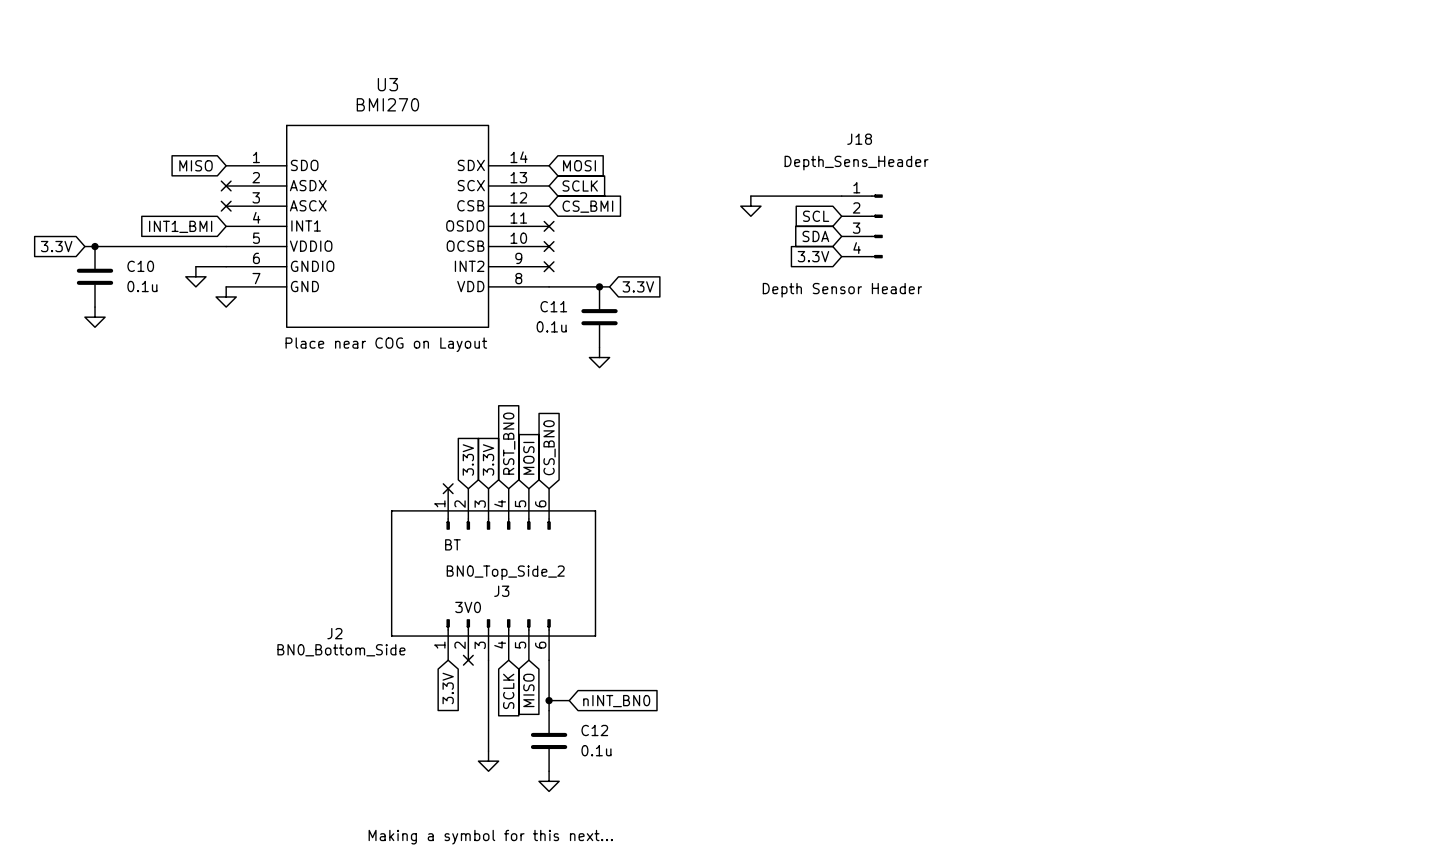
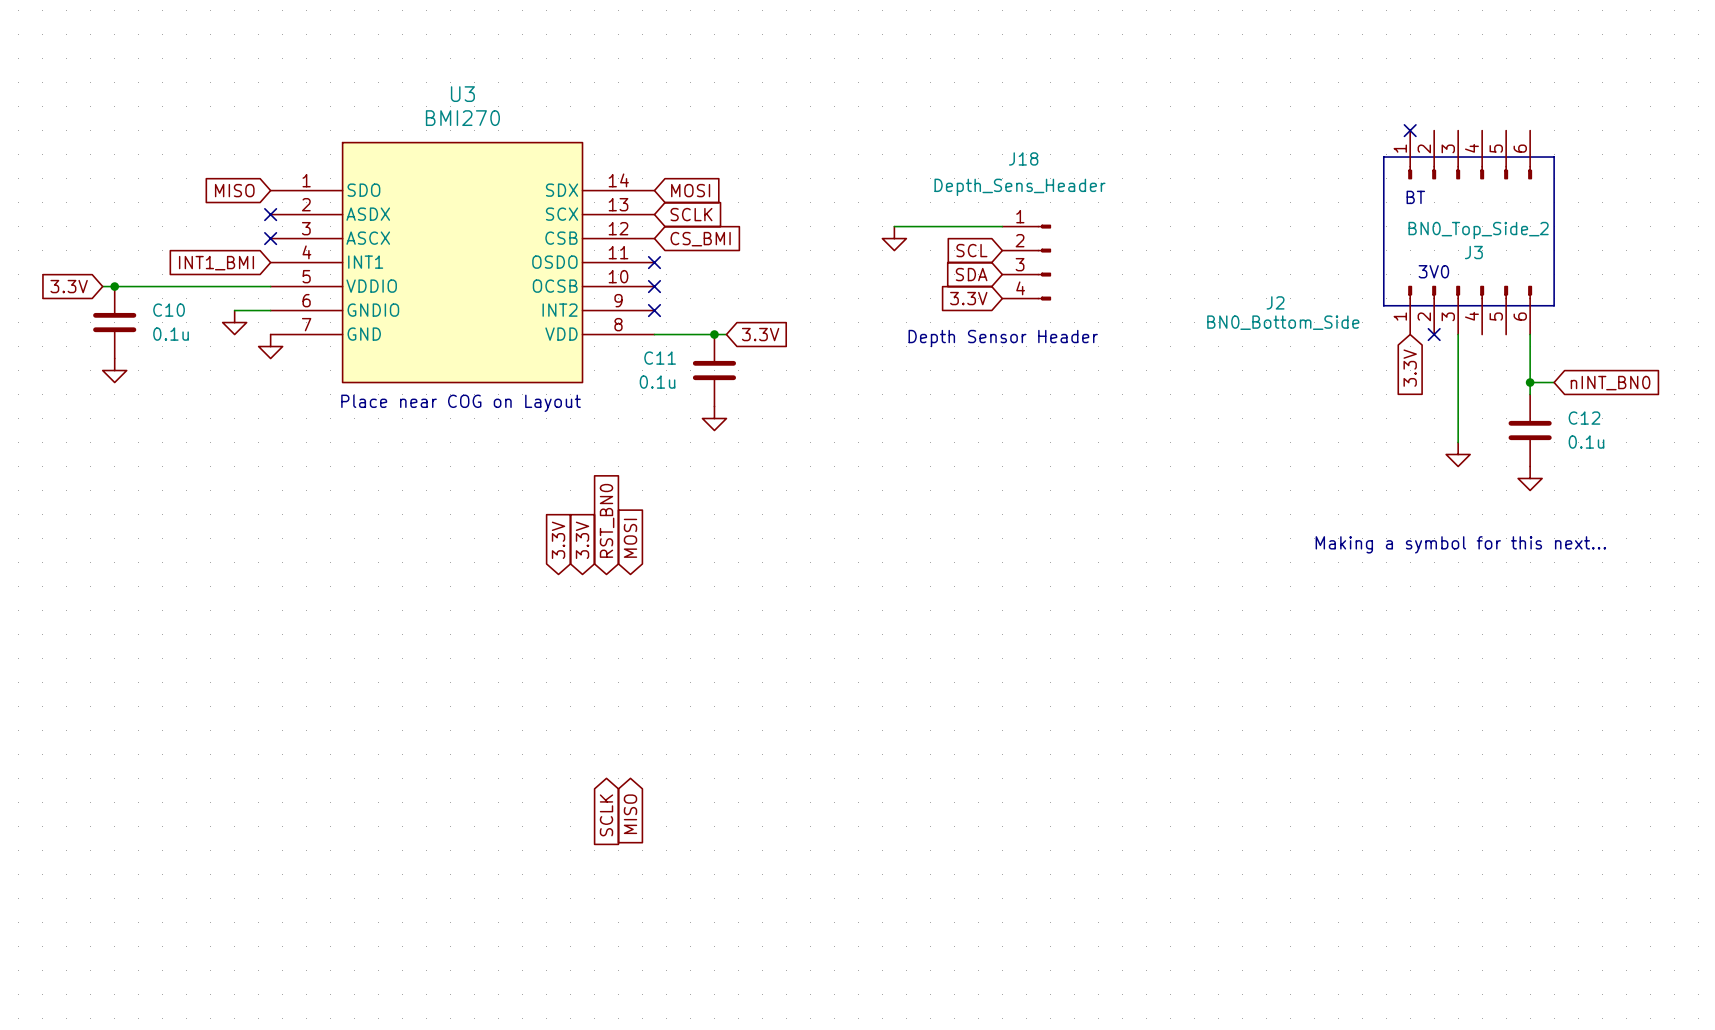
no-connect mark: none -> (1410, 130)
line: none -> (1383, 157) (1554, 157) (1554, 305) (1383, 305) (1383, 157)
text: none -> BT (1415, 197)
text: none -> 3V0 (1433, 271)
no-connect mark: none -> (1434, 334)
wire: none -> (1458, 334) (1458, 442)
wire: none -> (1530, 334) (1530, 394)
global label: none -> 3.3V (1410, 368)
wire: none -> (1530, 382) (1554, 382)
junction: none -> (1530, 382)
global label: none -> nINT_BN0 (1610, 383)
power symbol: none -> (1458, 454)
power symbol: none -> (1530, 478)
global label: CS_BN0 (549, 447) -> none
text: none -> Making a symbol for this next... (1460, 544)
no-connect mark: (448, 488) -> none
J3 position: (498, 509) -> (1470, 154)
line: (391, 510) (595, 510) (595, 636) (391, 636) (391, 510) -> none
text: BT (452, 544) -> none
text: 3V0 (468, 607) -> none
J2 position: (498, 639) -> (1470, 310)
no-connect mark: (468, 660) -> none
wire: (488, 660) (488, 751) -> none
wire: (549, 660) (549, 710) -> none
global label: 3.3V (448, 688) -> none
wire: (549, 700) (569, 700) -> none
junction: (549, 700) -> none
global label: nINT_BN0 (616, 701) -> none
C12 position: (549, 740) -> (1530, 430)
power symbol: (488, 761) -> none
power symbol: (549, 781) -> none
text: Making a symbol for this next... (490, 837) -> none

